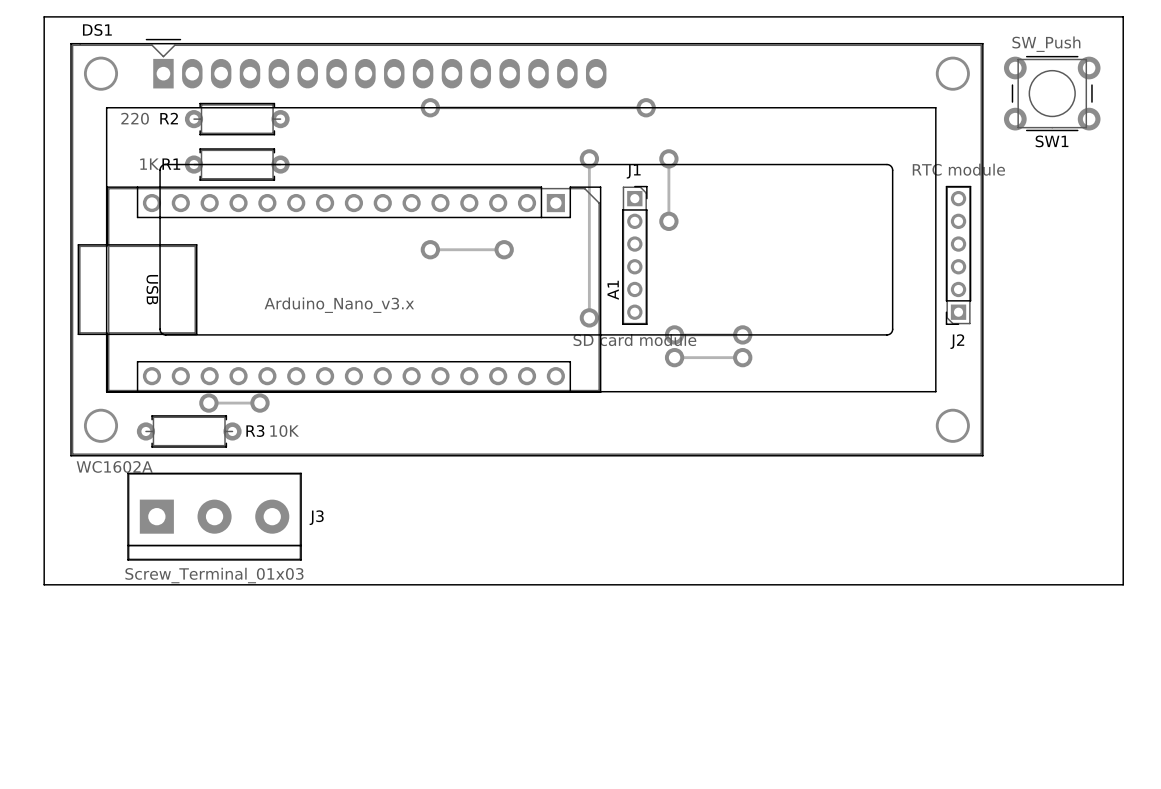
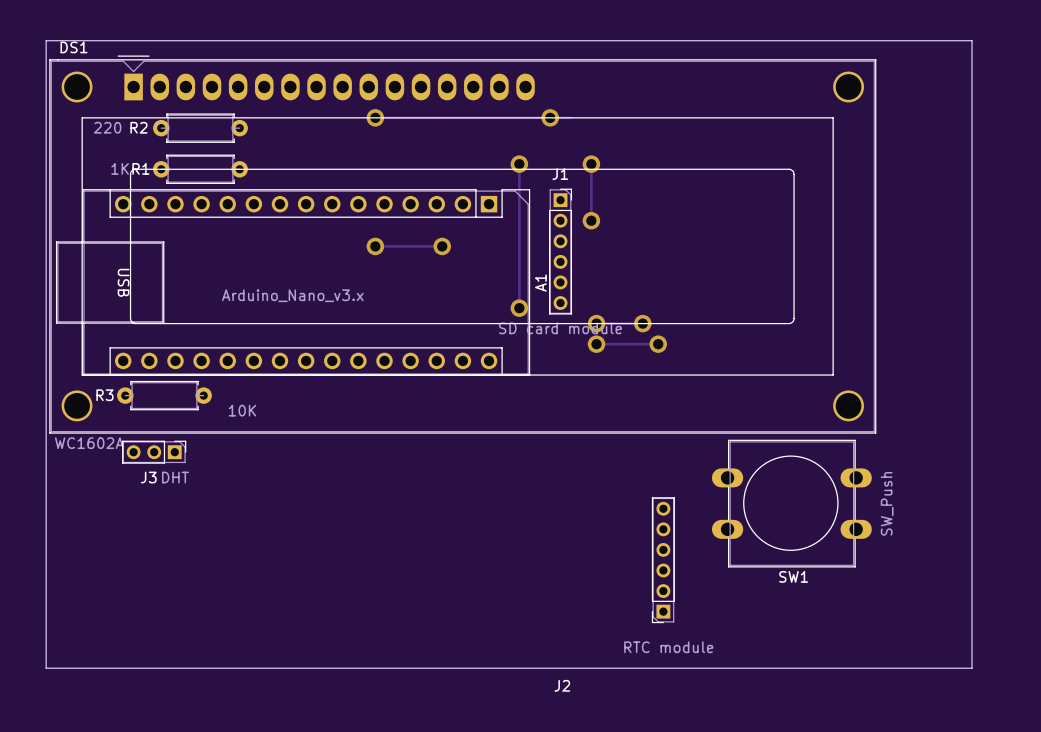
board edge: (44, 16) (1123, 16) (1123, 584) (44, 584) (44, 16) -> (46, 40) (46, 668) (972, 668) (972, 40) (46, 40)
SW1 value position: SW_Push (1046, 44) -> SW_Push (887, 503)
SW1 footprint: [1003, 55, 1101, 132] -> [711, 439, 872, 568]
via position: (646, 107) -> (550, 117)
SW1 name position: SW1 (1052, 141) -> SW1 (793, 576)
J2 value position: RTC module (958, 169) -> RTC module (668, 647)
J2 position: (958, 255) -> (663, 560)
via position: (742, 334) -> (642, 323)
J2 name position: J2 (957, 341) -> J2 (562, 685)
track: (208, 403) (259, 403) -> none
via: (208, 403) -> none
via: (259, 403) -> none
R3 position: (189, 431) -> (164, 395)
R3 name position: R3 (255, 431) -> R3 (104, 395)
J3 footprint: [127, 472, 302, 561] -> [122, 440, 187, 464]
J3 name position: J3 (316, 517) -> J3 (148, 477)
J3 value: Screw_Terminal_01x03 (214, 575) -> DHT (175, 477)

